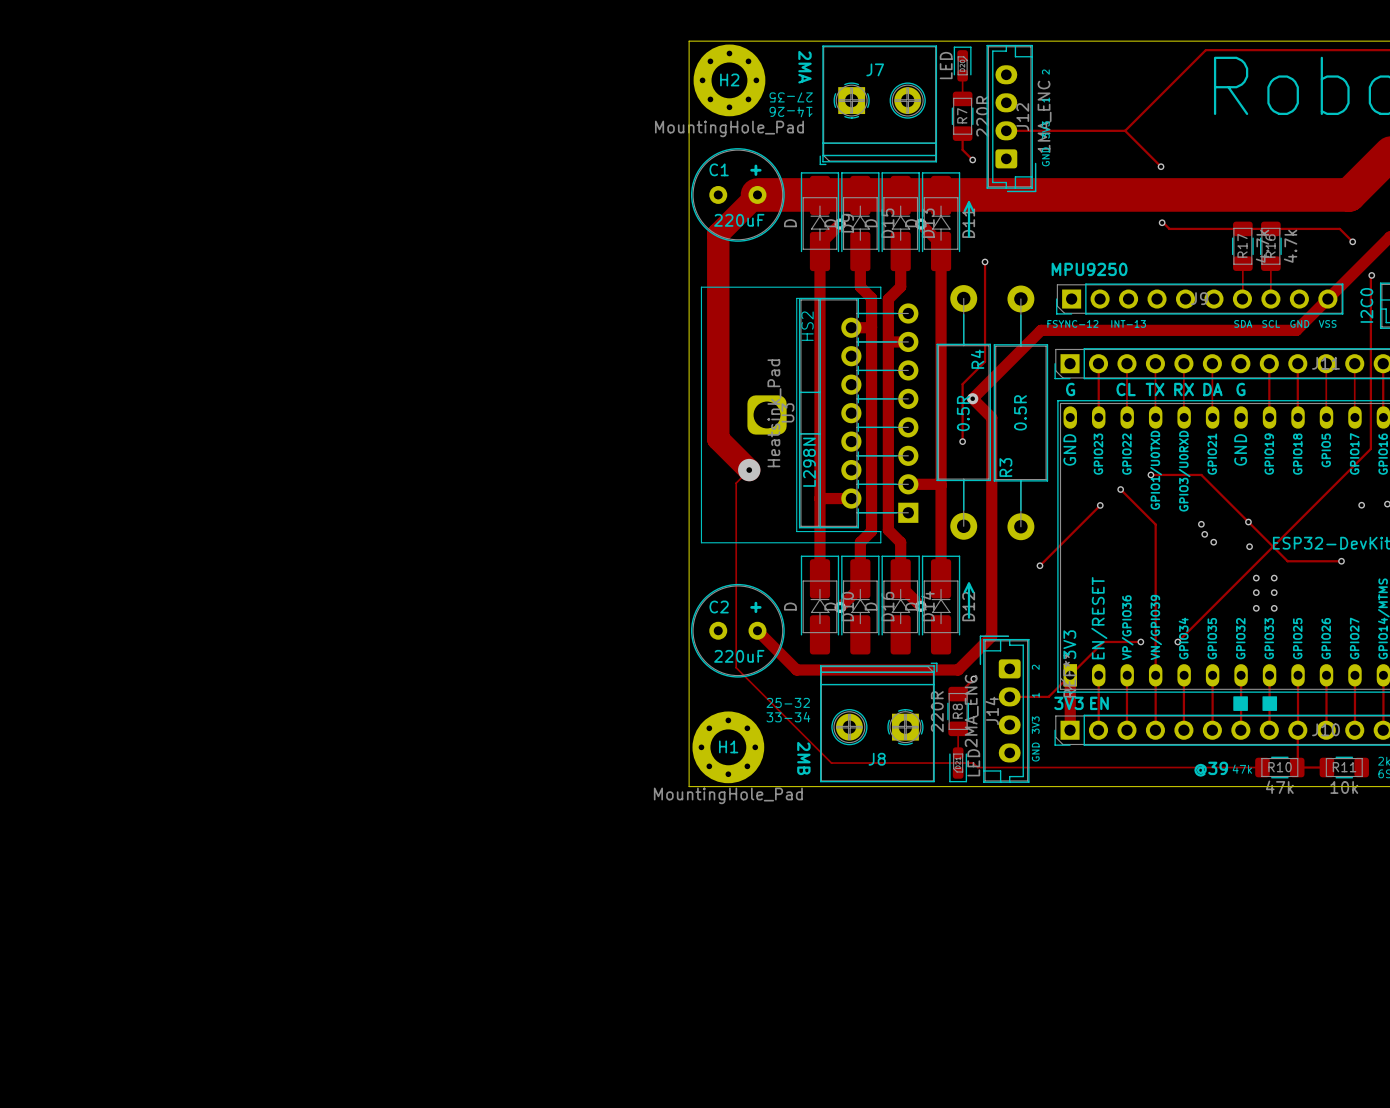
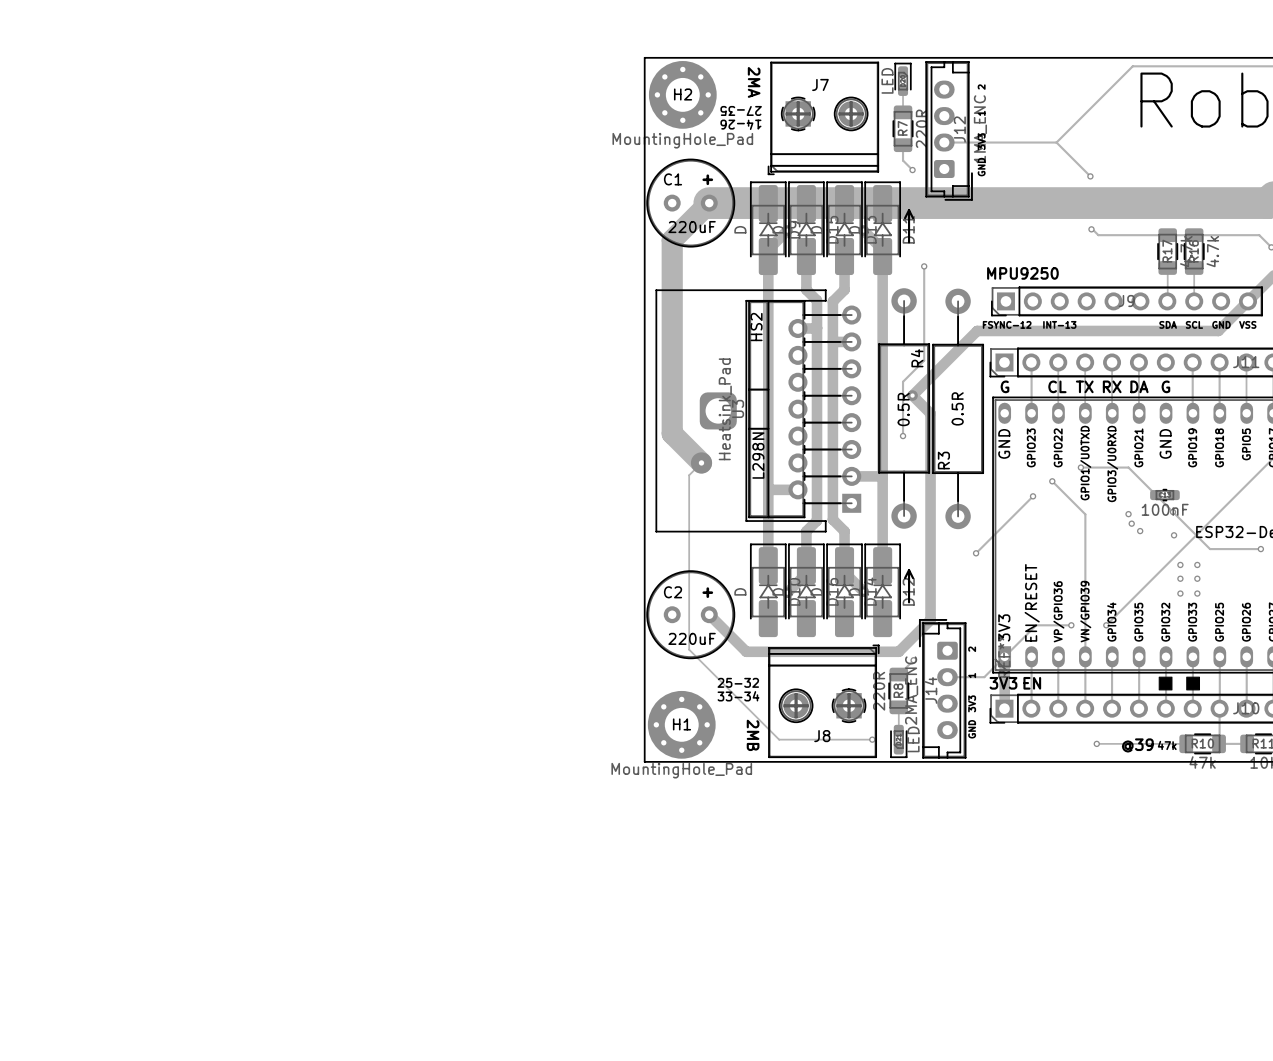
part: none -> 100nF (1164, 495)
track: (930, 763) (973, 763) (977, 767) (1167, 767) -> none
via: none -> (872, 739)
via: none -> (1096, 743)

